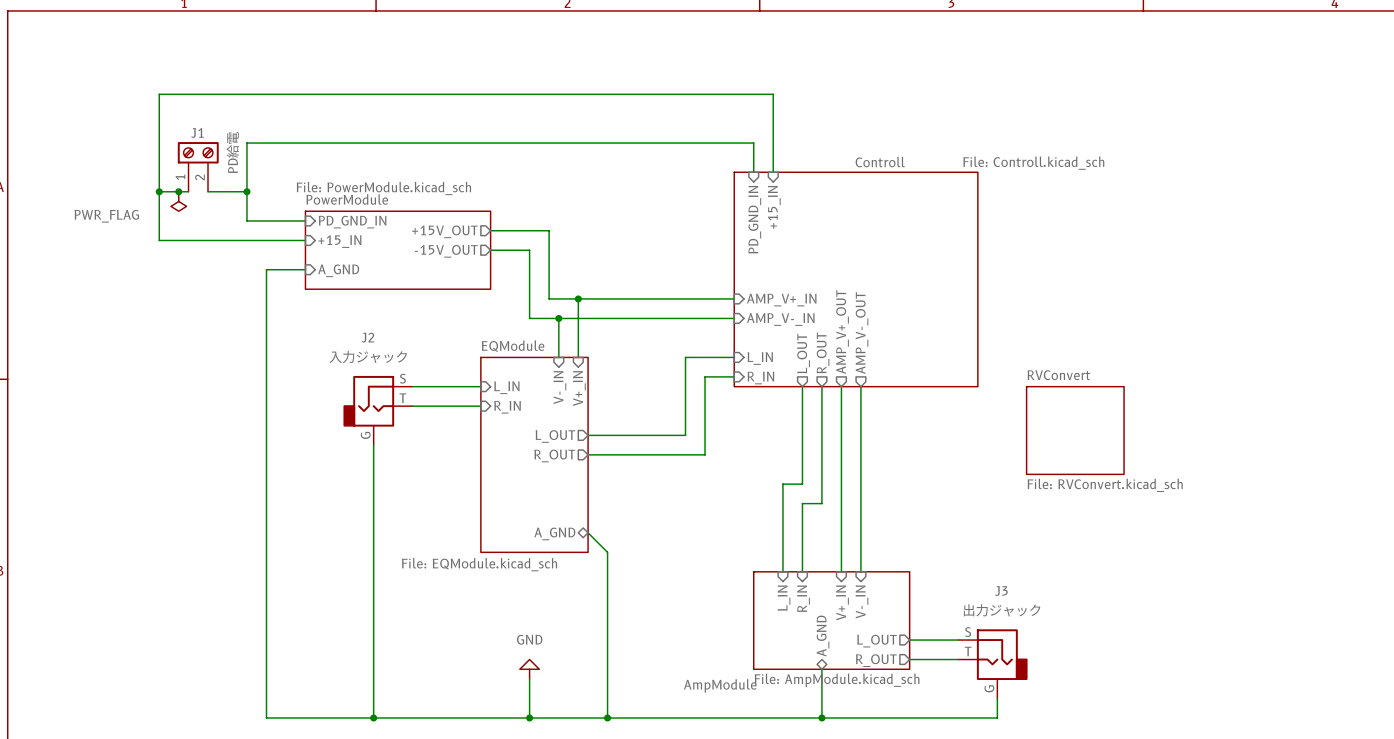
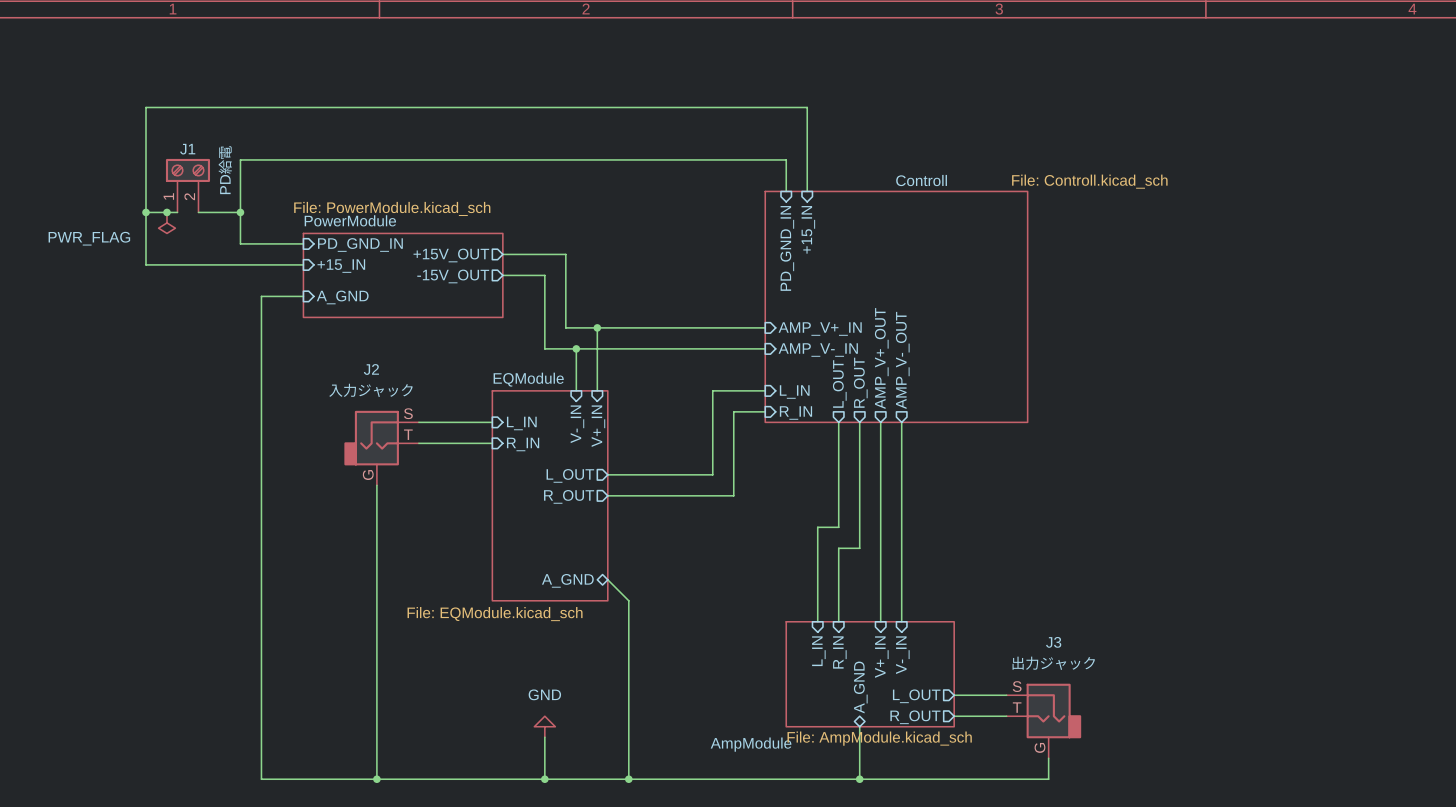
sheet RVConvert: File: RVConvert.kicad_sch (1075, 430) -> none

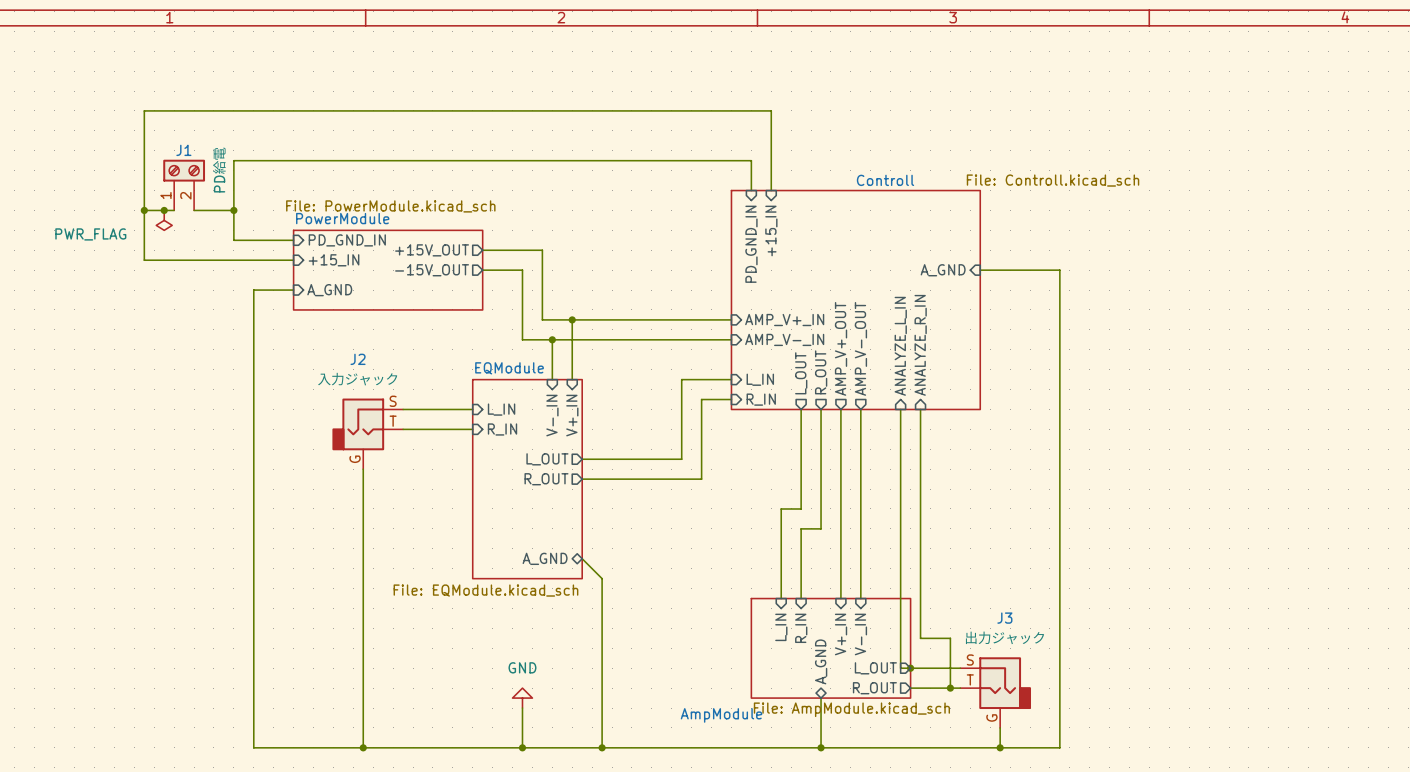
wire: none -> (980, 270) (1059, 270) (1059, 747) (1000, 747)
sheet pin: none -> A_GND (943, 270)
sheet pin: none -> ANALYZE_R_IN (920, 345)
sheet pin: none -> ANALYZE_L_IN (900, 346)
wire: none -> (900, 409) (900, 668) (910, 668)
wire: none -> (920, 409) (920, 638) (950, 638) (950, 688)
junction: none -> (910, 668)
junction: none -> (950, 688)
junction: none -> (1000, 747)

